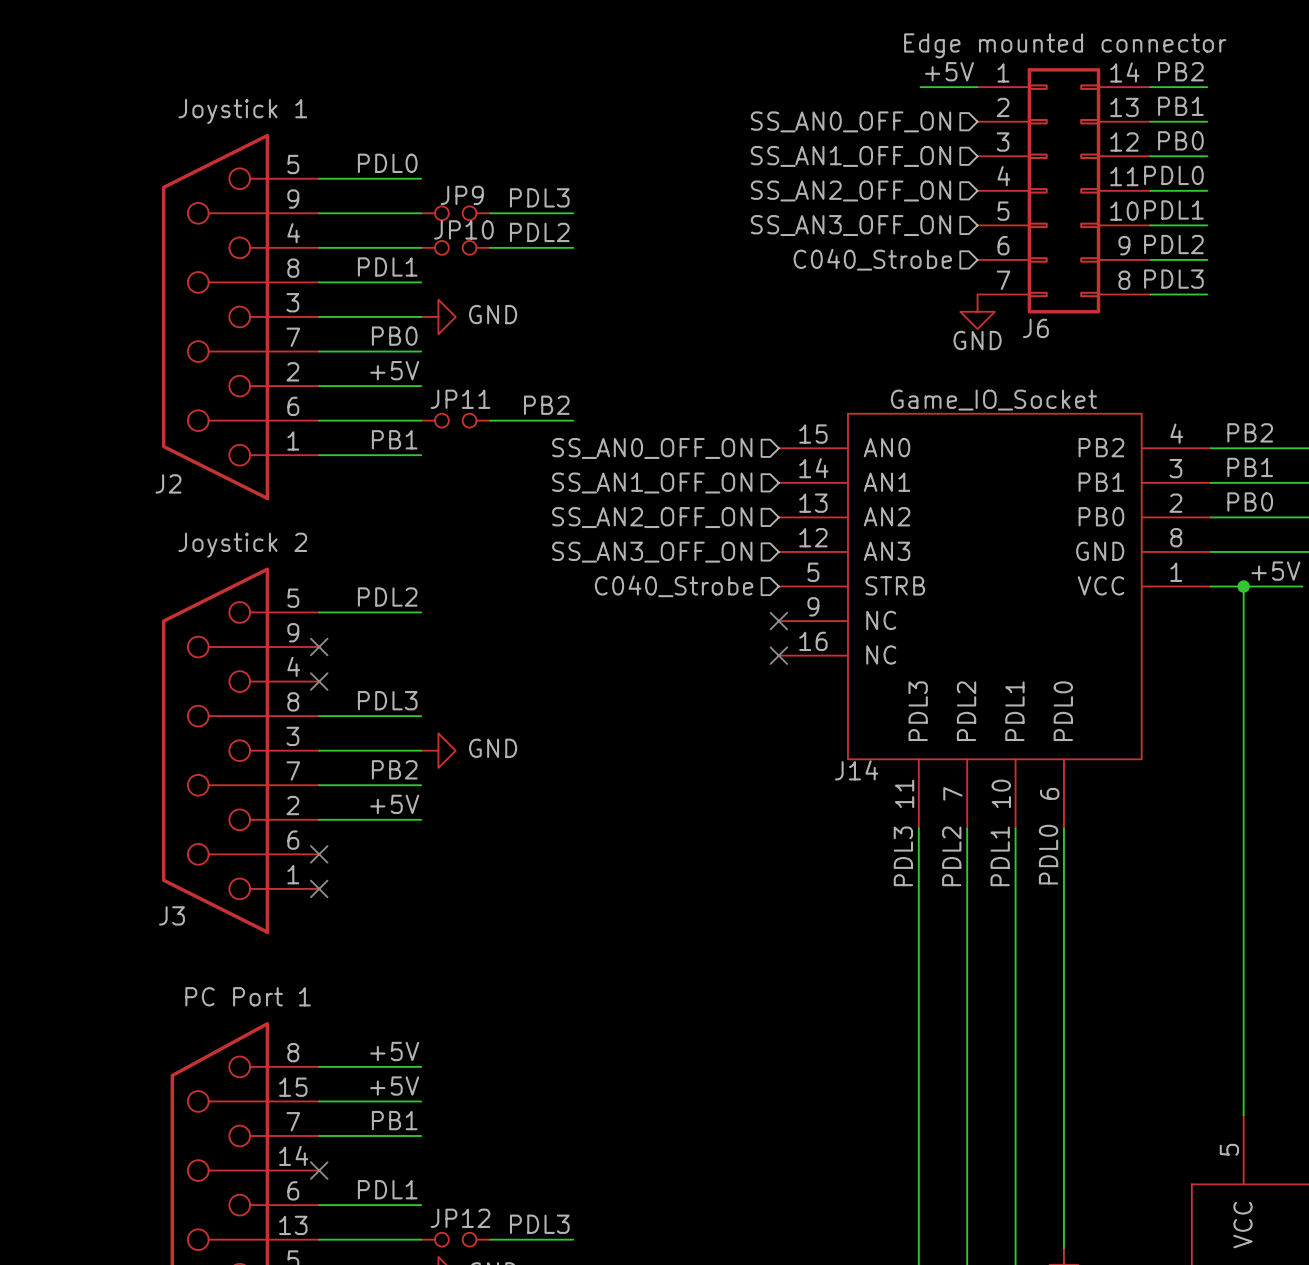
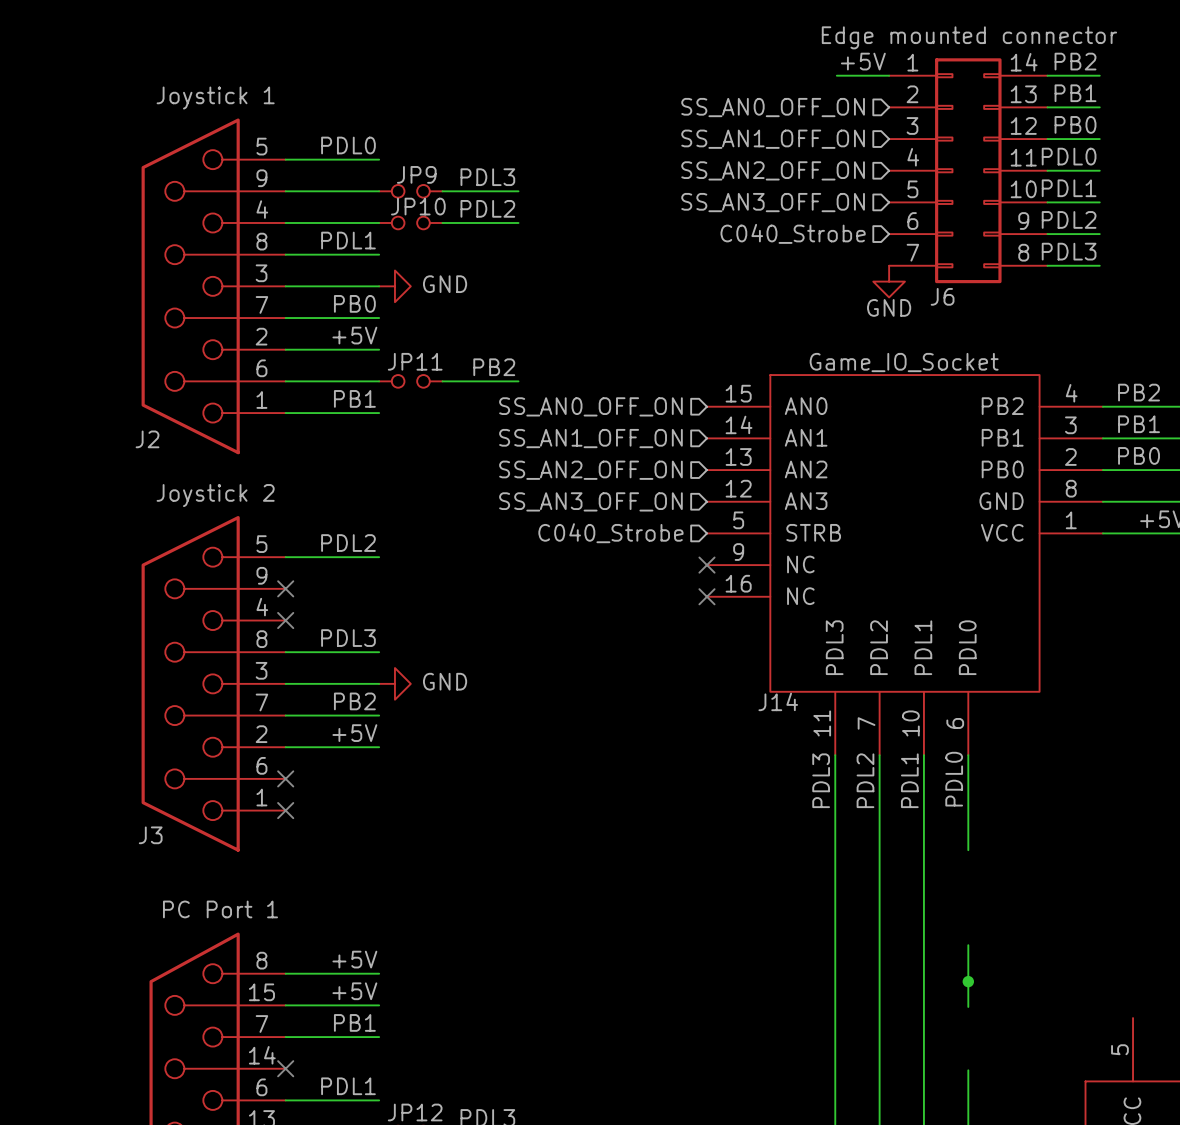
wire: (1243, 586) (1243, 1115) -> none
junction: (1243, 586) -> none
wire: (1063, 932) (1063, 1035) -> none
junction: none -> (968, 981)
wire: (1063, 1103) (1063, 1172) -> none

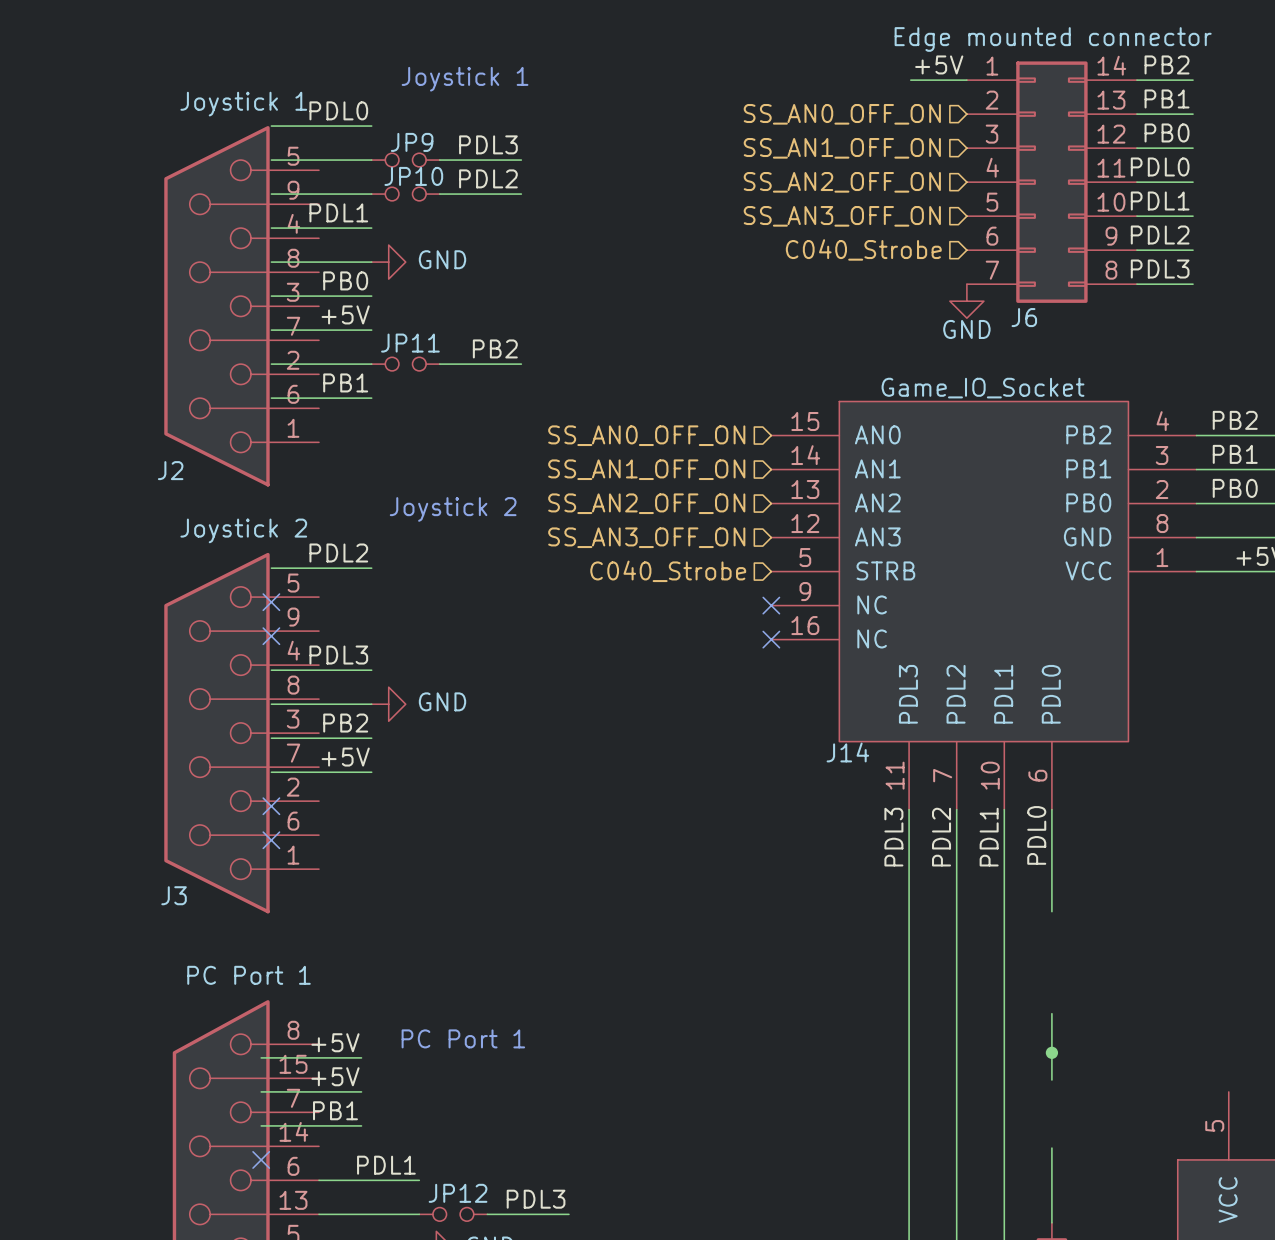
text: none -> Joystick 1 (465, 79)
label position: PDL0 (348, 145) -> PDL0 (338, 110)
wire: (285, 159) (379, 159) -> (271, 126) (371, 126)
label position: PDL3 (487, 177) -> PDL3 (488, 144)
wire: (285, 191) (379, 191) -> (271, 160) (371, 160)
JP9 position: (410, 191) -> (405, 160)
wire: (442, 191) (518, 191) -> (439, 160) (521, 160)
label position: PDL2 (487, 208) -> PDL2 (488, 178)
wire: (285, 222) (379, 222) -> (271, 194) (371, 194)
JP10 position: (410, 222) -> (405, 194)
wire: (442, 222) (518, 222) -> (439, 194) (521, 194)
label position: PDL1 (348, 240) -> PDL1 (338, 212)
wire: (285, 254) (379, 254) -> (271, 228) (371, 228)
wire: (285, 286) (379, 286) -> (271, 262) (371, 262)
power symbol position: GND (394, 286) -> GND (388, 262)
label position: PB0 (354, 303) -> PB0 (345, 280)
wire: (285, 318) (379, 318) -> (271, 296) (371, 296)
label position: +5V (354, 335) -> +5V (345, 314)
wire: (285, 349) (379, 349) -> (271, 330) (371, 330)
label position: PB2 (494, 367) -> PB2 (495, 348)
wire: (285, 381) (379, 381) -> (271, 364) (371, 364)
JP11 position: (410, 381) -> (405, 364)
wire: (442, 381) (518, 381) -> (439, 364) (521, 364)
label position: PB1 (354, 398) -> PB1 (345, 382)
wire: (285, 413) (379, 413) -> (271, 398) (371, 398)
text: none -> Joystick 2 (453, 509)
label position: PDL2 (348, 543) -> PDL2 (338, 552)
wire: (285, 557) (379, 557) -> (271, 568) (371, 568)
no-connect mark: none -> (271, 602)
no-connect mark: (285, 588) -> none
no-connect mark: none -> (271, 636)
no-connect mark: (285, 620) -> none
label position: PDL3 (348, 638) -> PDL3 (338, 655)
wire: (285, 652) (379, 652) -> (271, 670) (371, 670)
wire: (285, 683) (379, 683) -> (271, 704) (371, 704)
power symbol position: GND (394, 683) -> GND (388, 704)
label position: PB2 (354, 701) -> PB2 (345, 723)
wire: (285, 715) (379, 715) -> (271, 738) (371, 738)
label position: +5V (354, 733) -> +5V (345, 757)
wire: (285, 747) (379, 747) -> (271, 772) (371, 772)
no-connect mark: none -> (271, 806)
no-connect mark: (285, 778) -> none
no-connect mark: none -> (271, 840)
no-connect mark: (285, 810) -> none
label: +5V (354, 959) -> none
text: none -> PC Port 1 (463, 1038)
label: none -> +5V (335, 1042)
wire: (285, 973) (379, 973) -> (261, 1057) (361, 1057)
label: +5V (354, 991) -> none
label: none -> +5V (335, 1076)
wire: (285, 1005) (379, 1005) -> (261, 1091) (361, 1091)
label position: PB1 (354, 1022) -> PB1 (335, 1110)
wire: (285, 1037) (379, 1037) -> (261, 1125) (361, 1125)
no-connect mark position: (285, 1068) -> (261, 1159)

